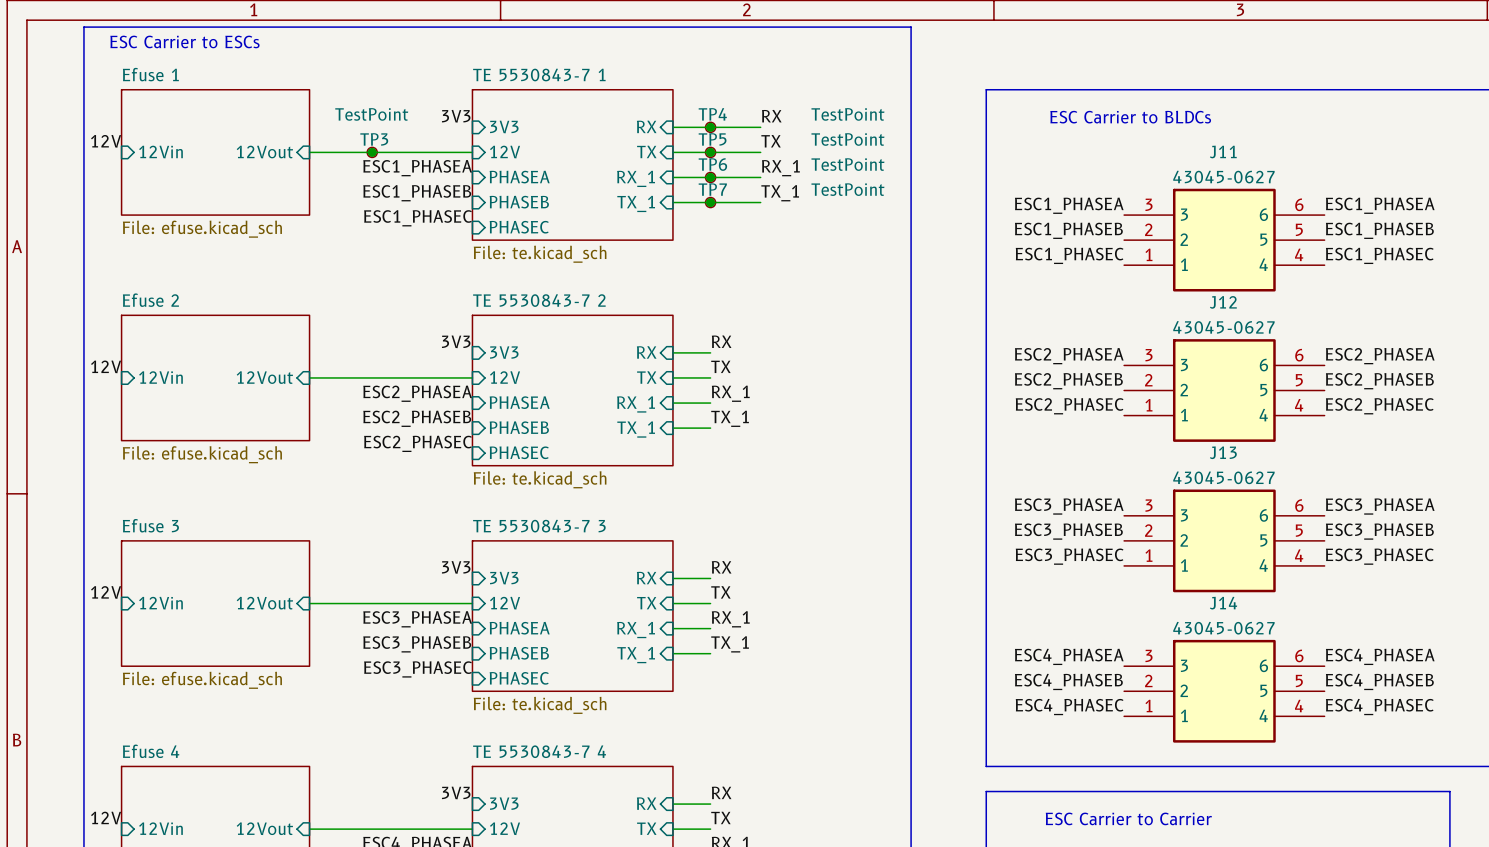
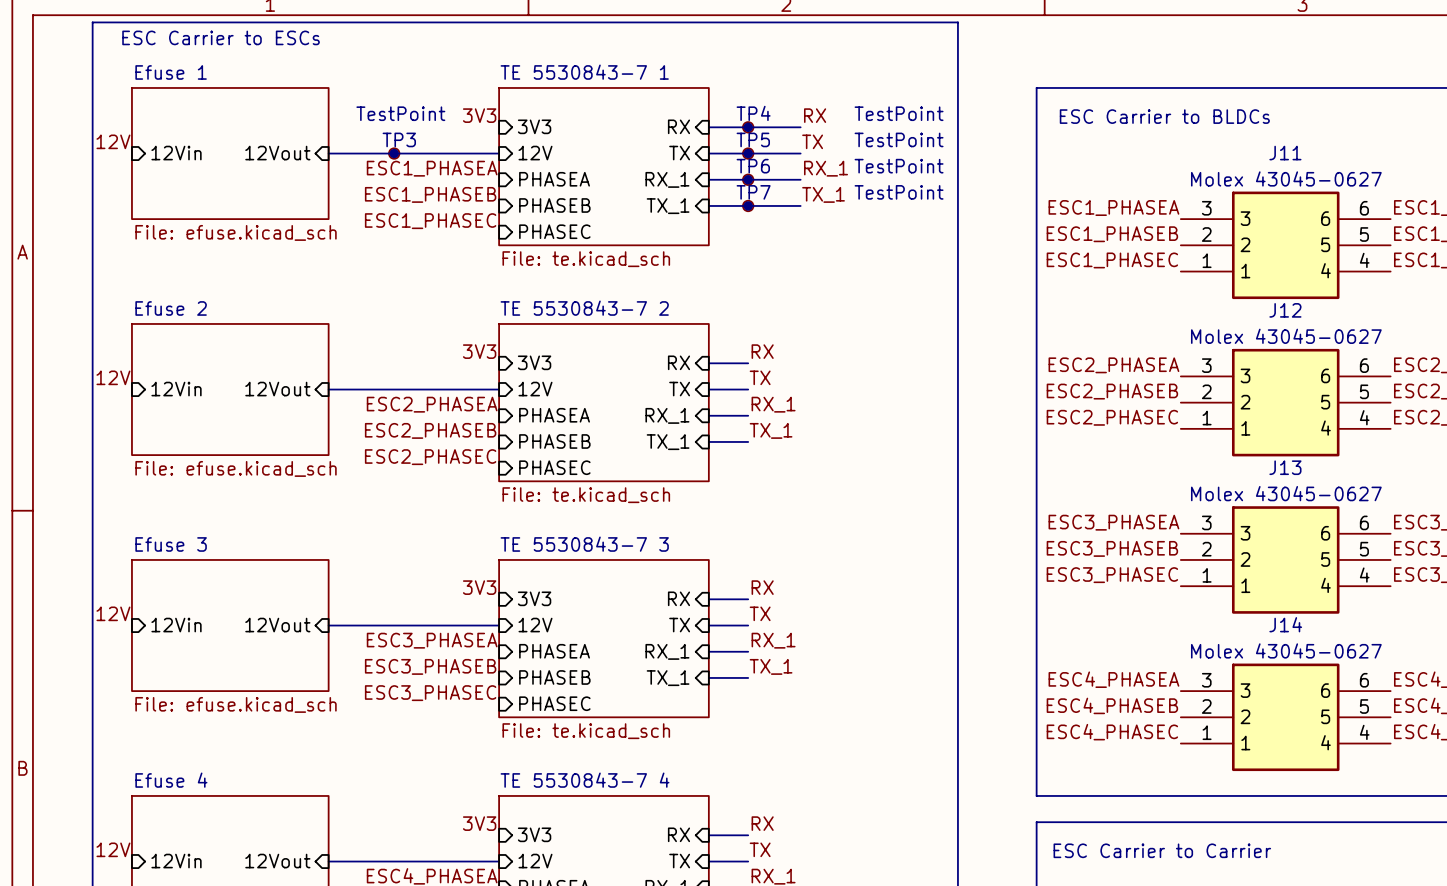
J11 value: 43045-0627 (1223, 177) -> Molex 43045-0627 (1286, 178)
J12 value: 43045-0627 (1223, 327) -> Molex 43045-0627 (1286, 336)
J13 value: 43045-0627 (1223, 477) -> Molex 43045-0627 (1286, 493)
J14 value: 43045-0627 (1223, 628) -> Molex 43045-0627 (1286, 650)

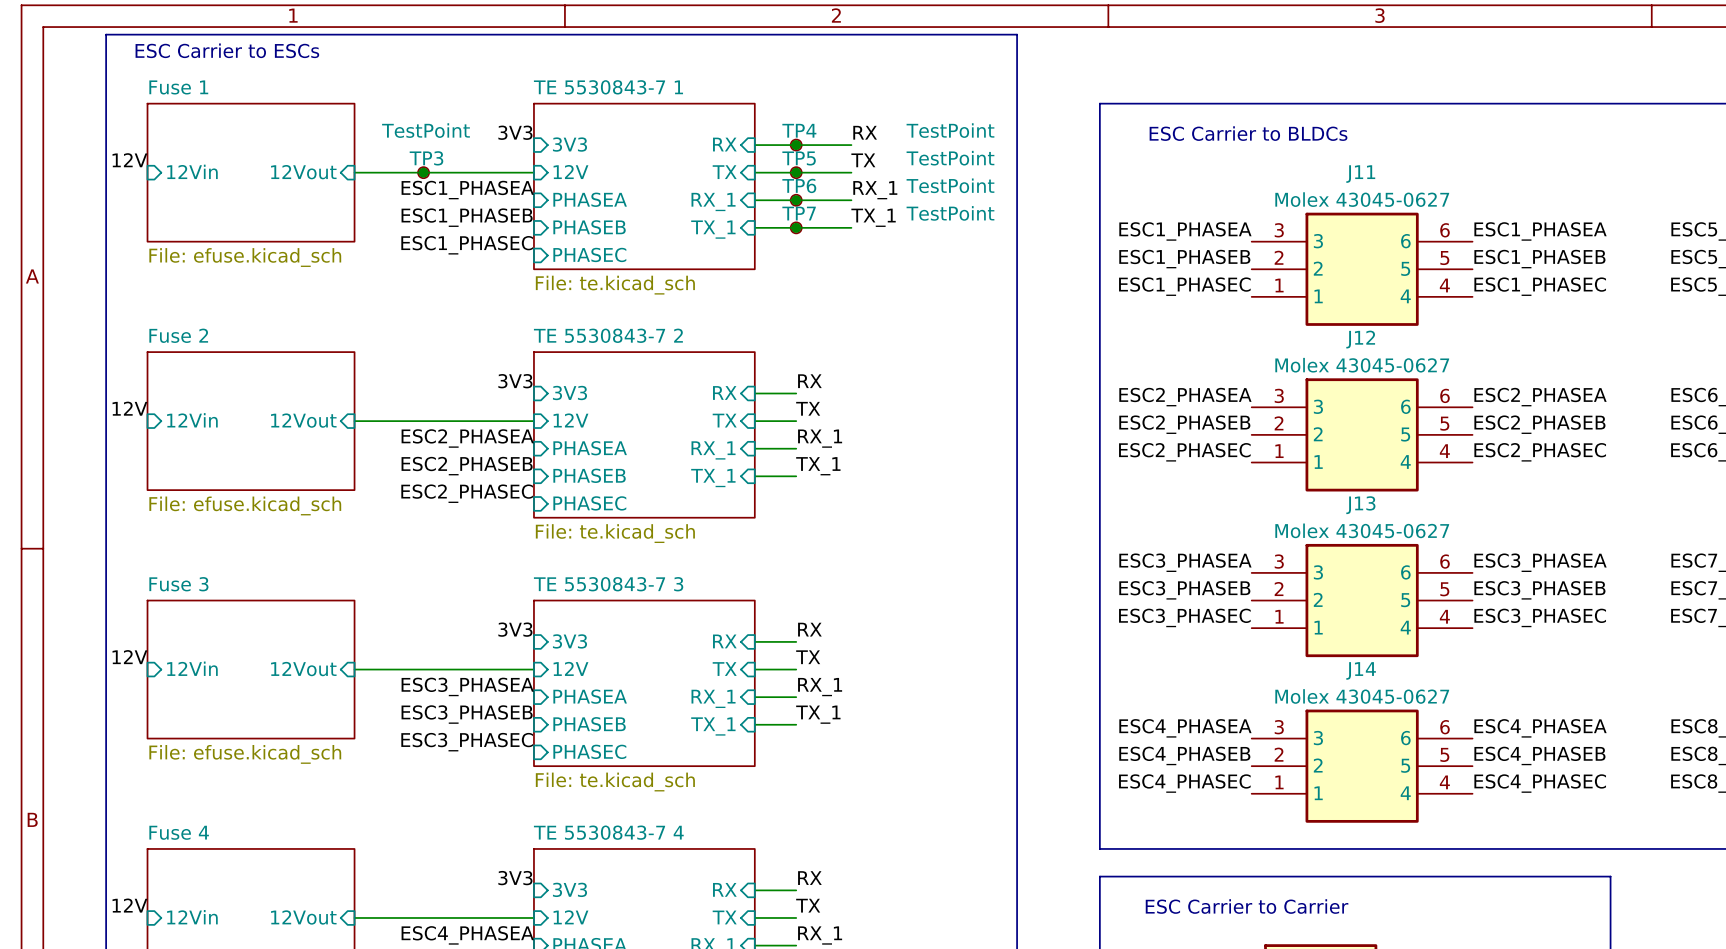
sheet Efuse 1 name: Efuse 1 (171, 72) -> Fuse 1 (178, 87)
sheet Efuse 2 name: Efuse 2 (171, 308) -> Fuse 2 (178, 335)
sheet Efuse 3 name: Efuse 3 (171, 544) -> Fuse 3 (178, 584)
sheet Efuse 4 name: Efuse 4 (171, 780) -> Fuse 4 (179, 832)

